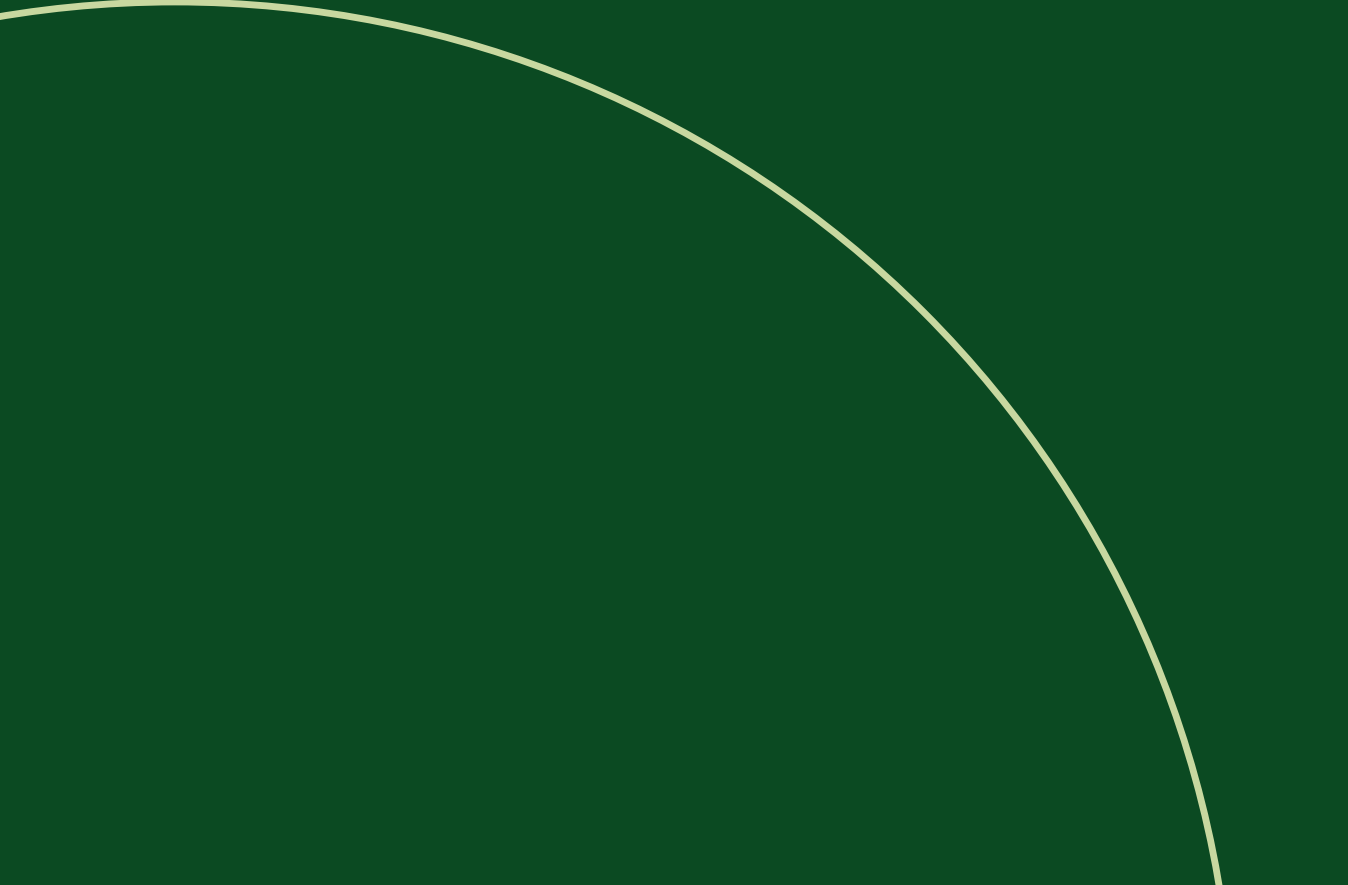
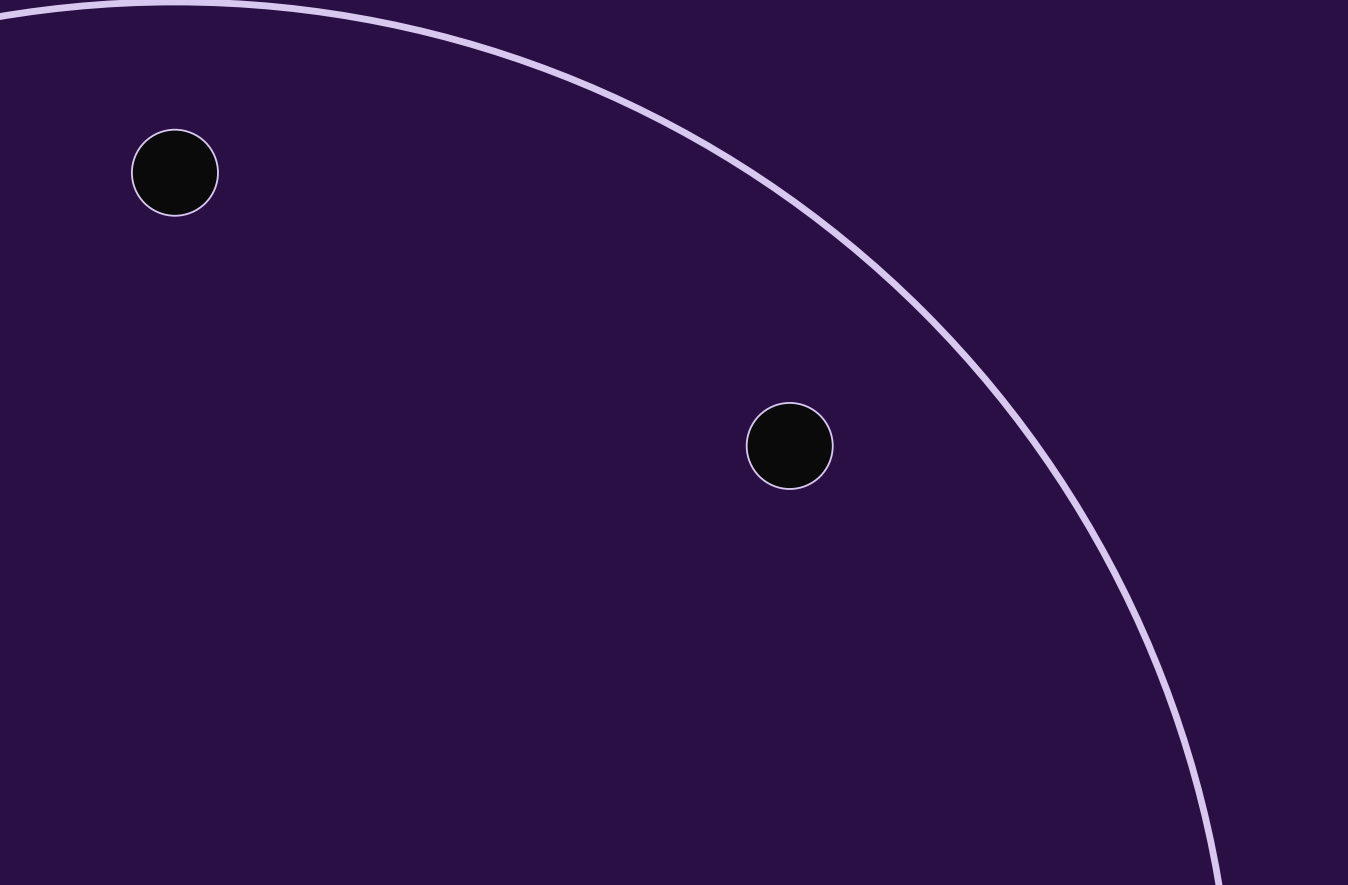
hole: none -> (174, 172)
hole: none -> (789, 445)

